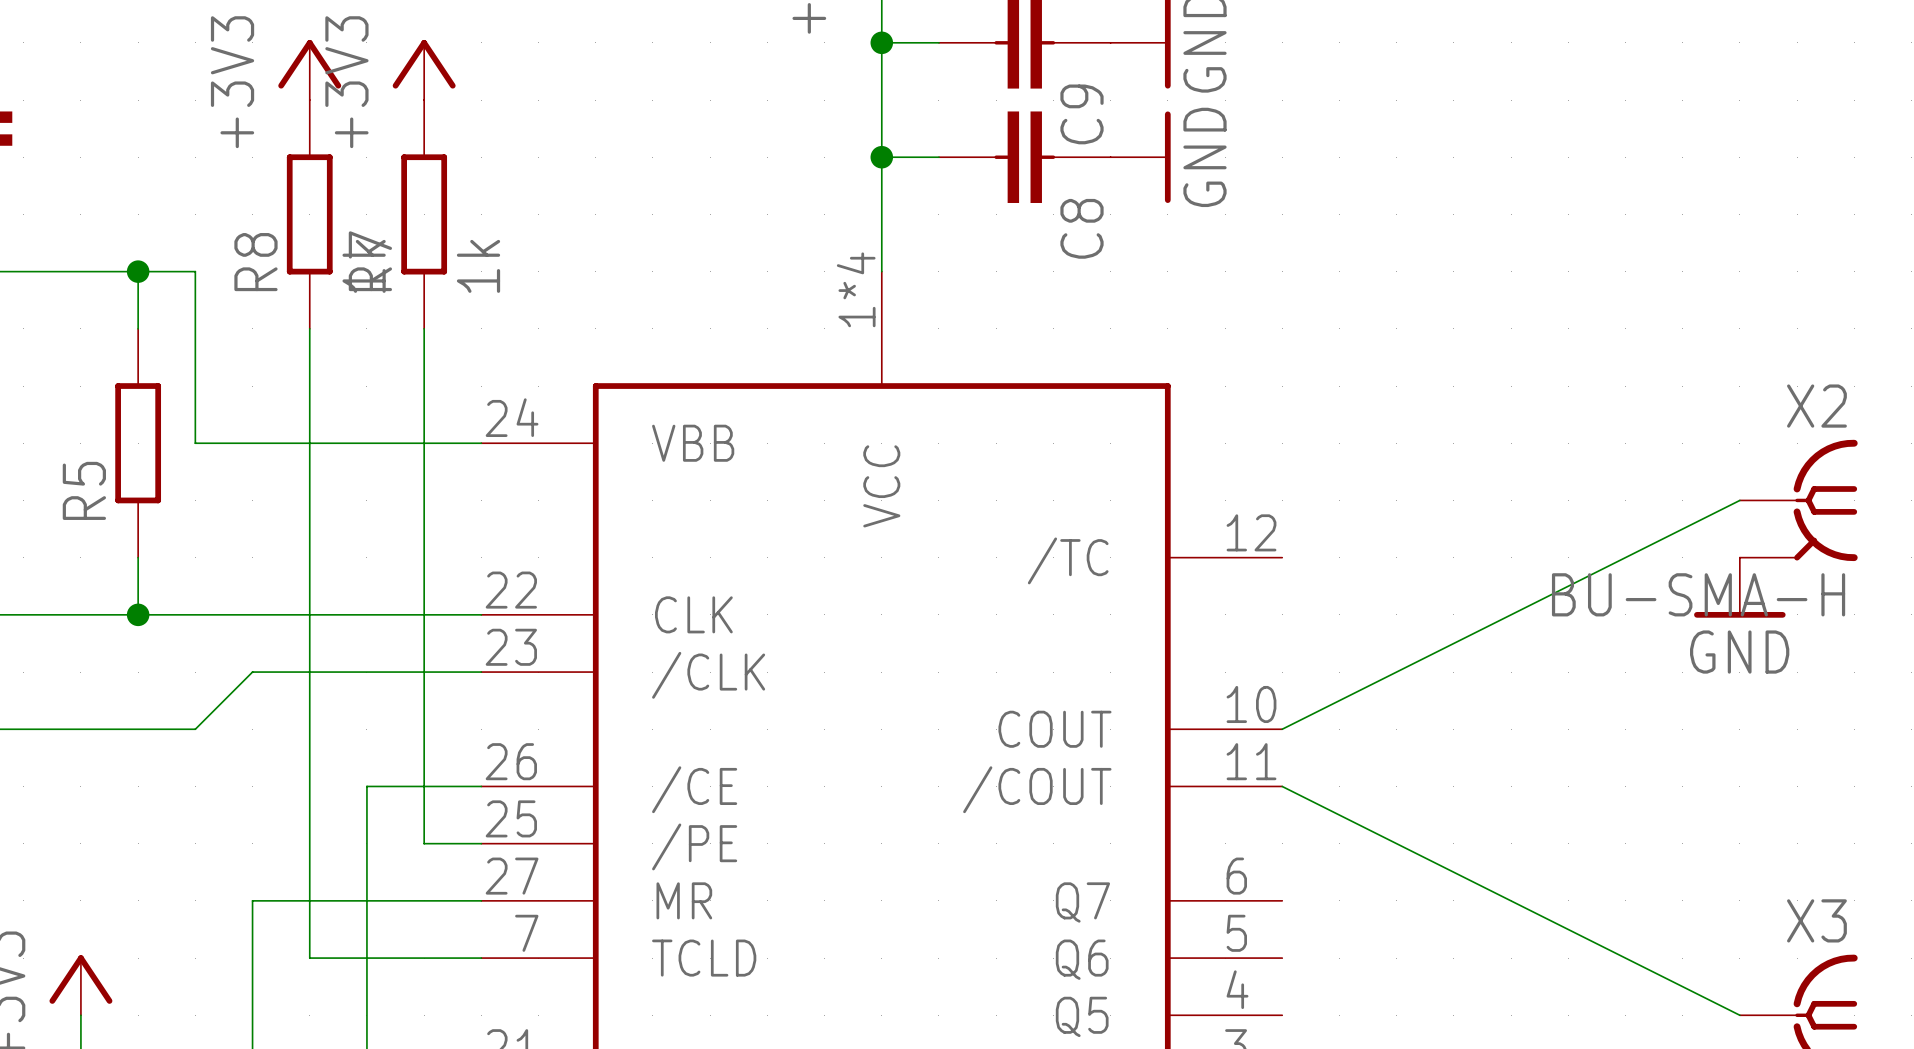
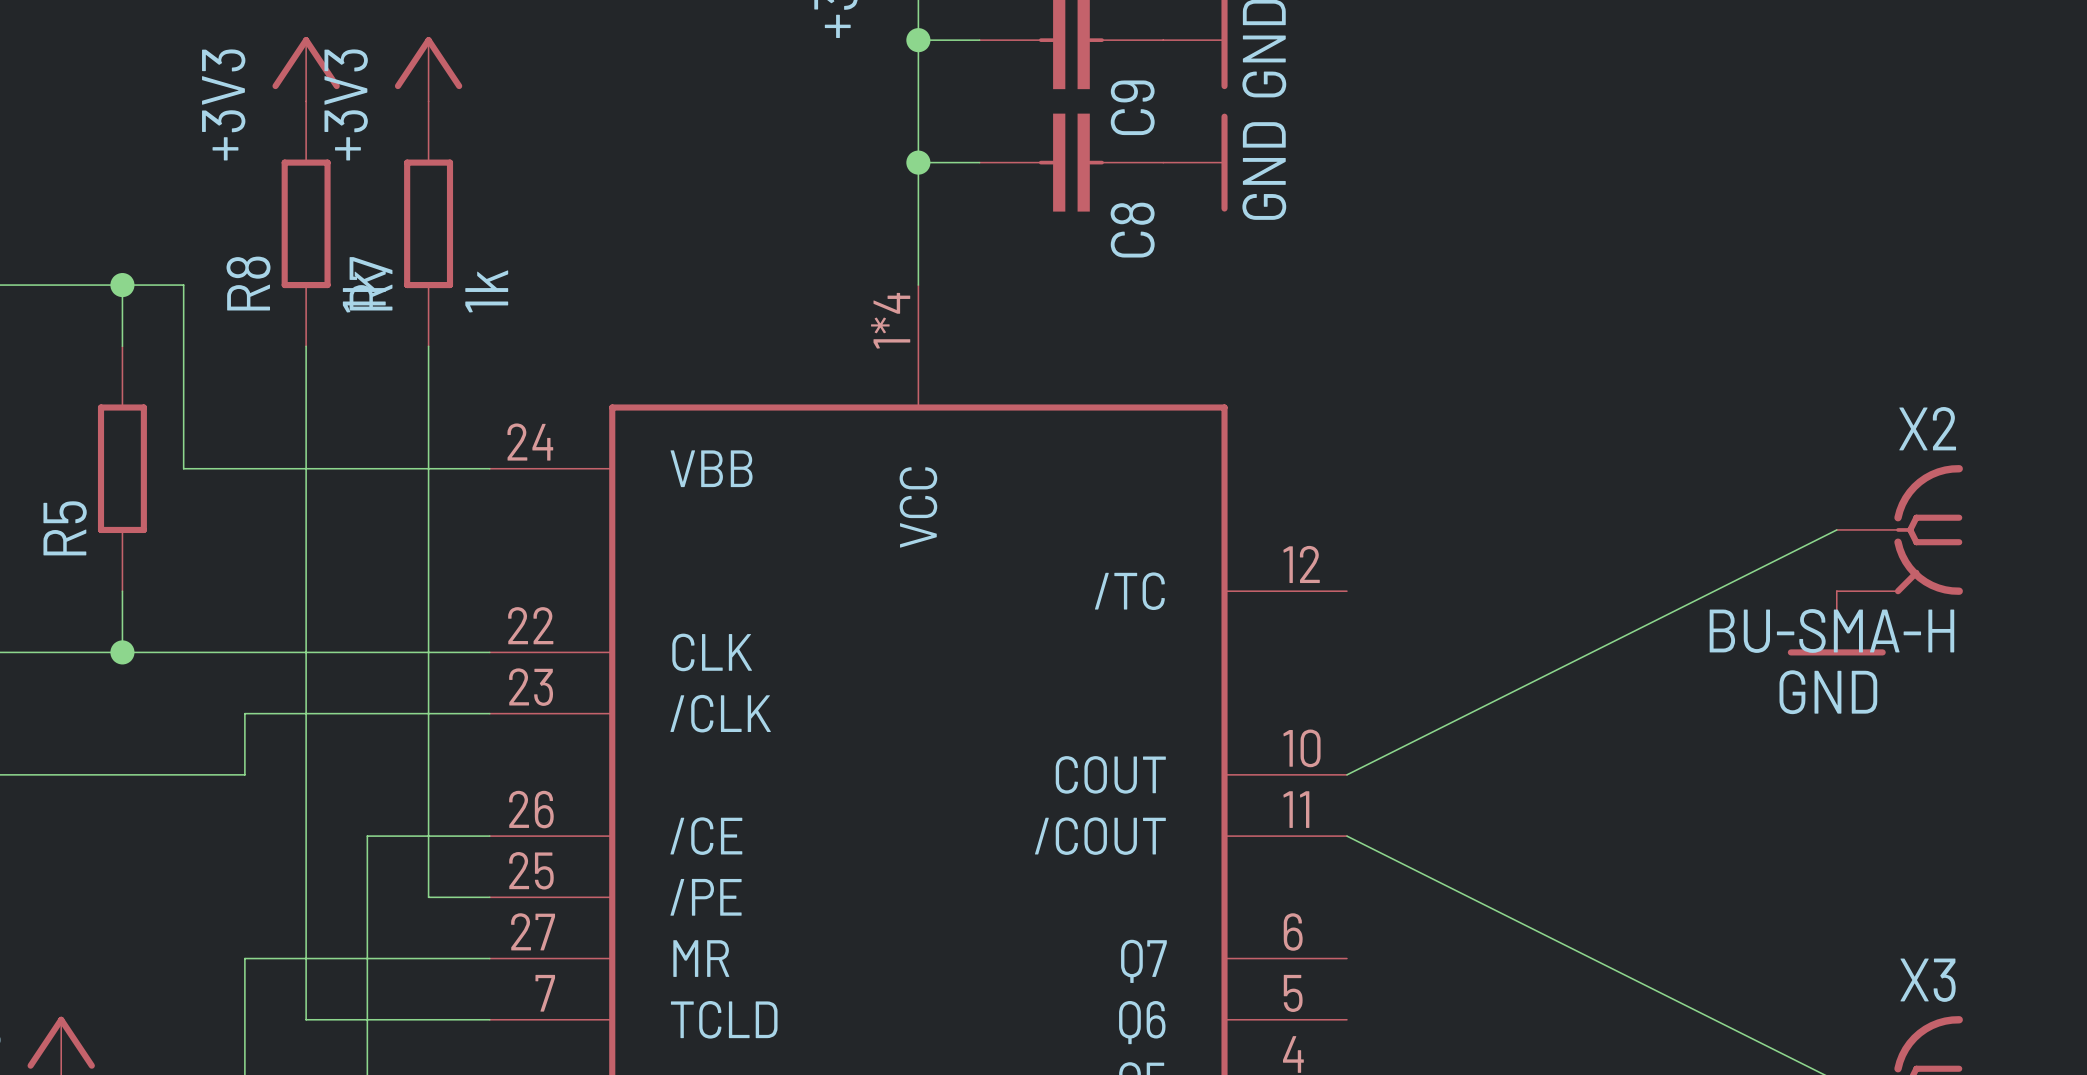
wire: (252, 672) (195, 729) -> (244, 713) (244, 774) (183, 774)

